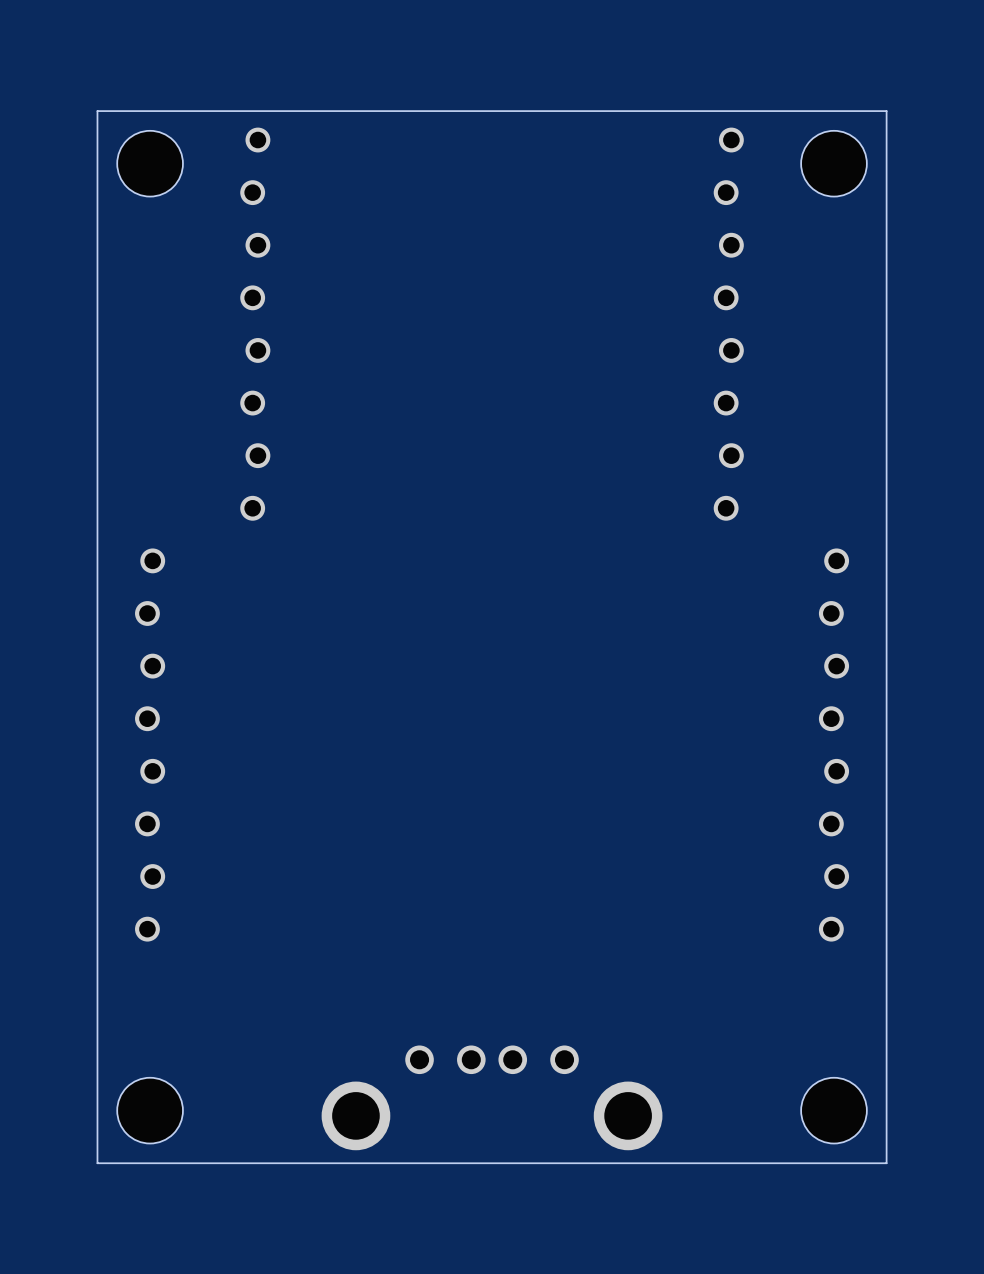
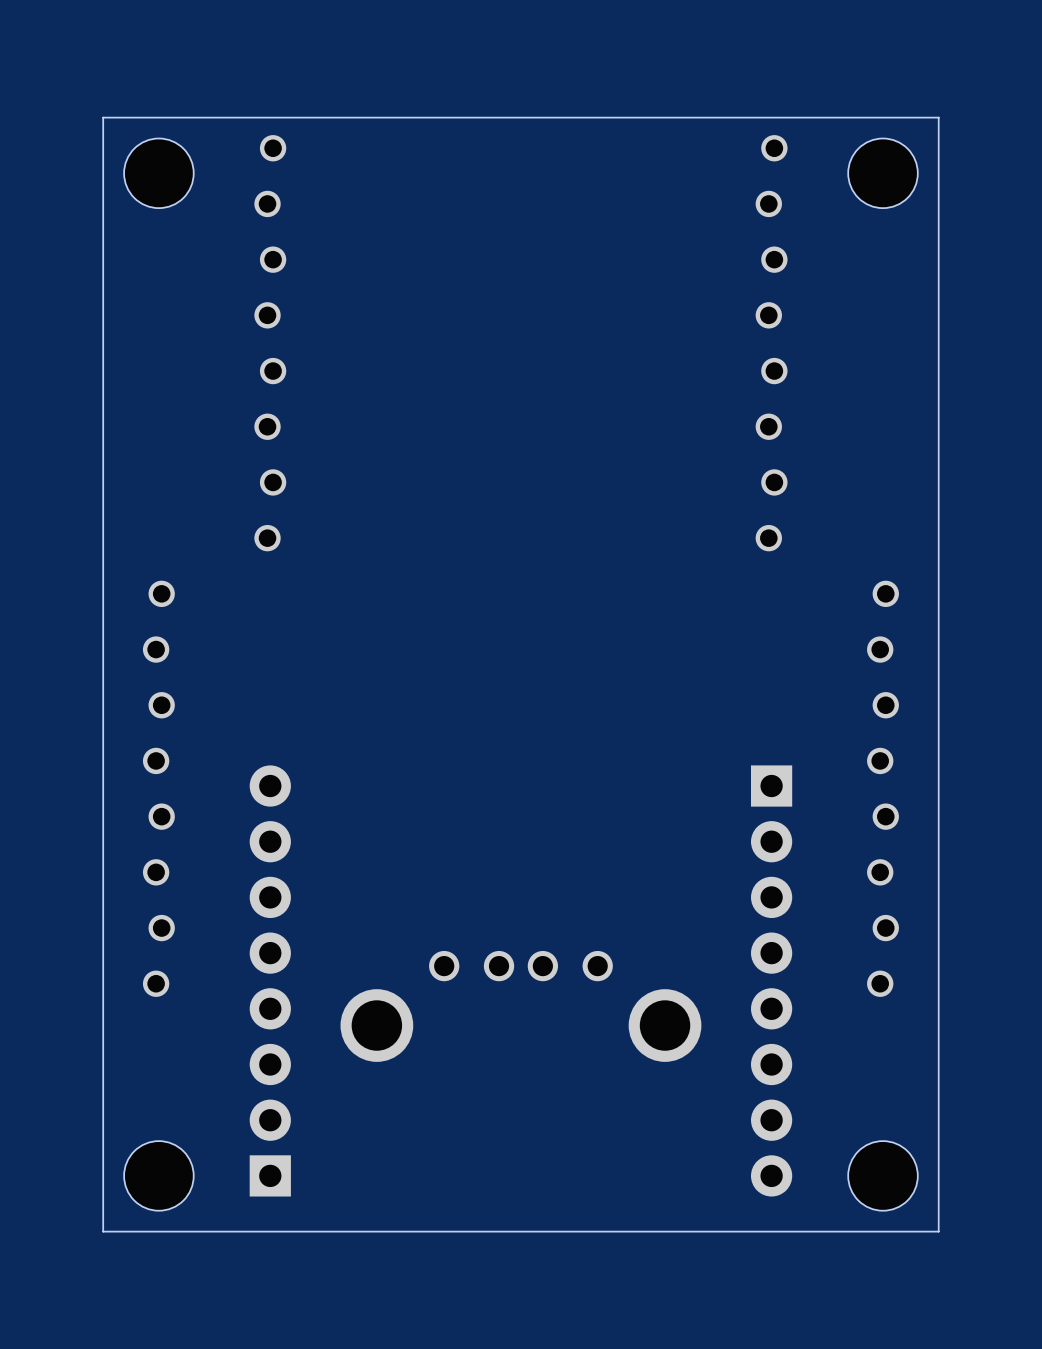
part: none -> (270, 980)
part: none -> (771, 980)
part position: (492, 1097) -> (520, 1006)

